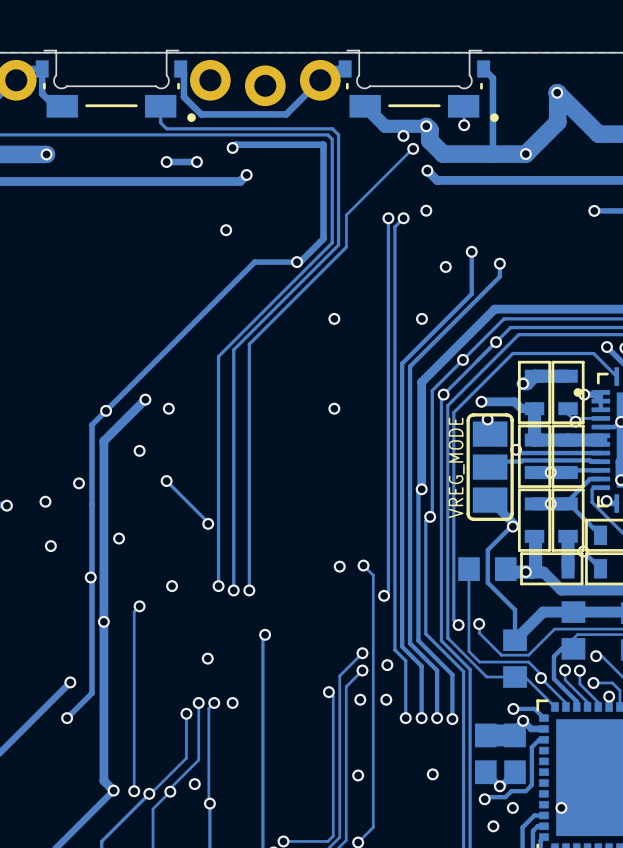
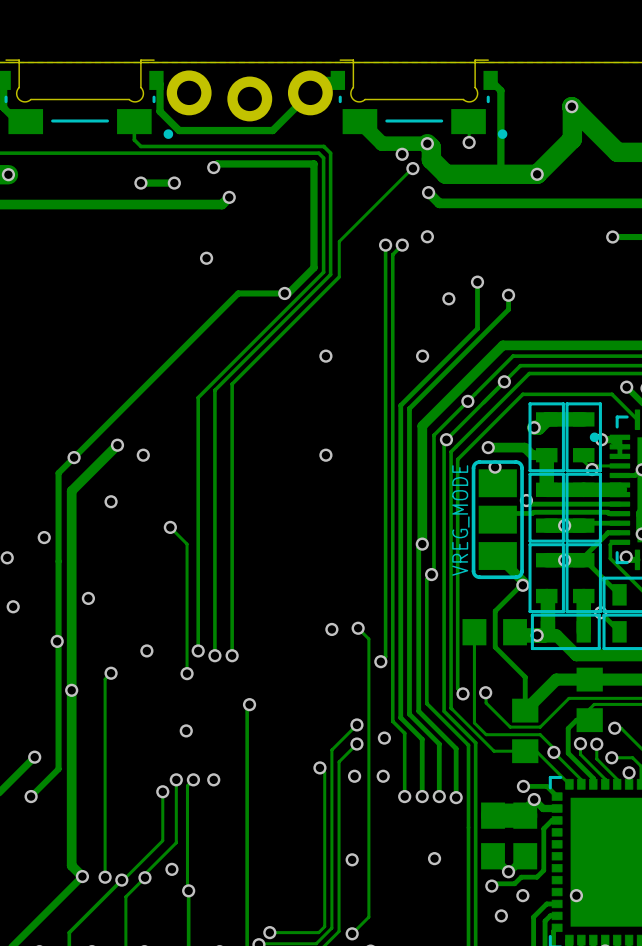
track: none -> (170, 527) (187, 544) (187, 673)
via: none -> (170, 527)
track: (166, 481) (208, 523) -> none
via: (166, 481) -> none
via: (208, 523) -> none
via: none -> (187, 673)

